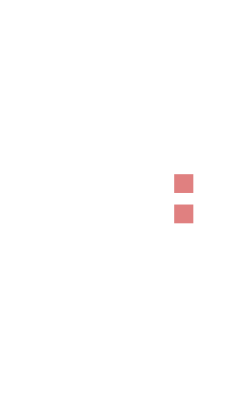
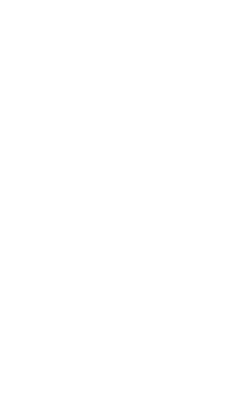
part: (183, 198) -> none

